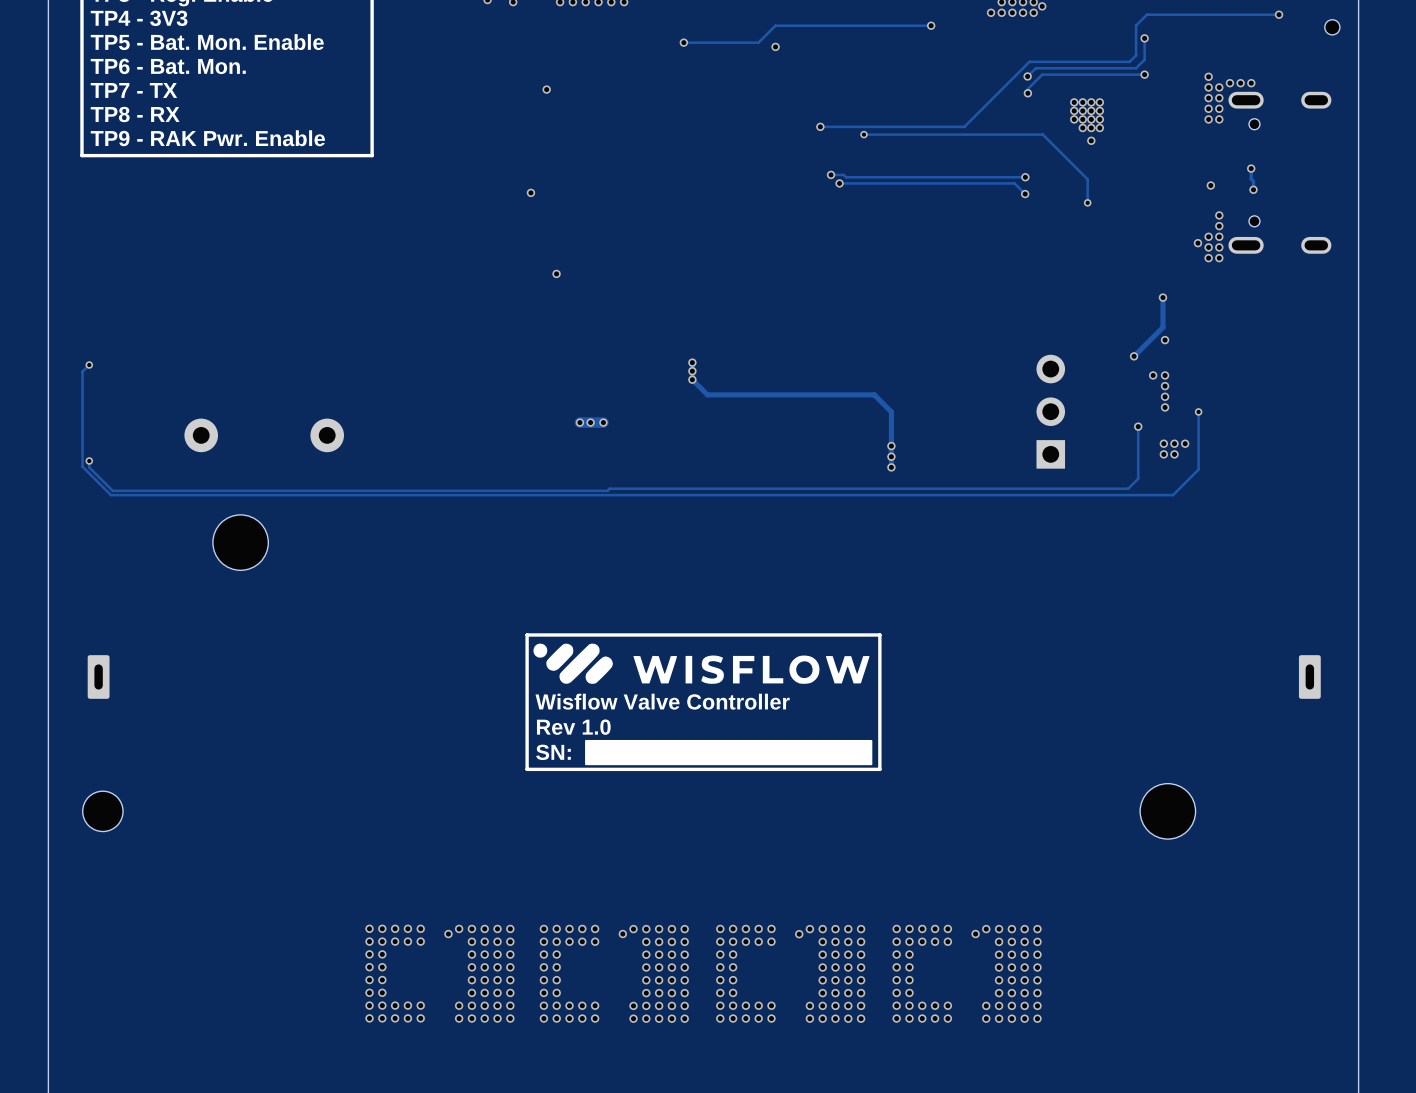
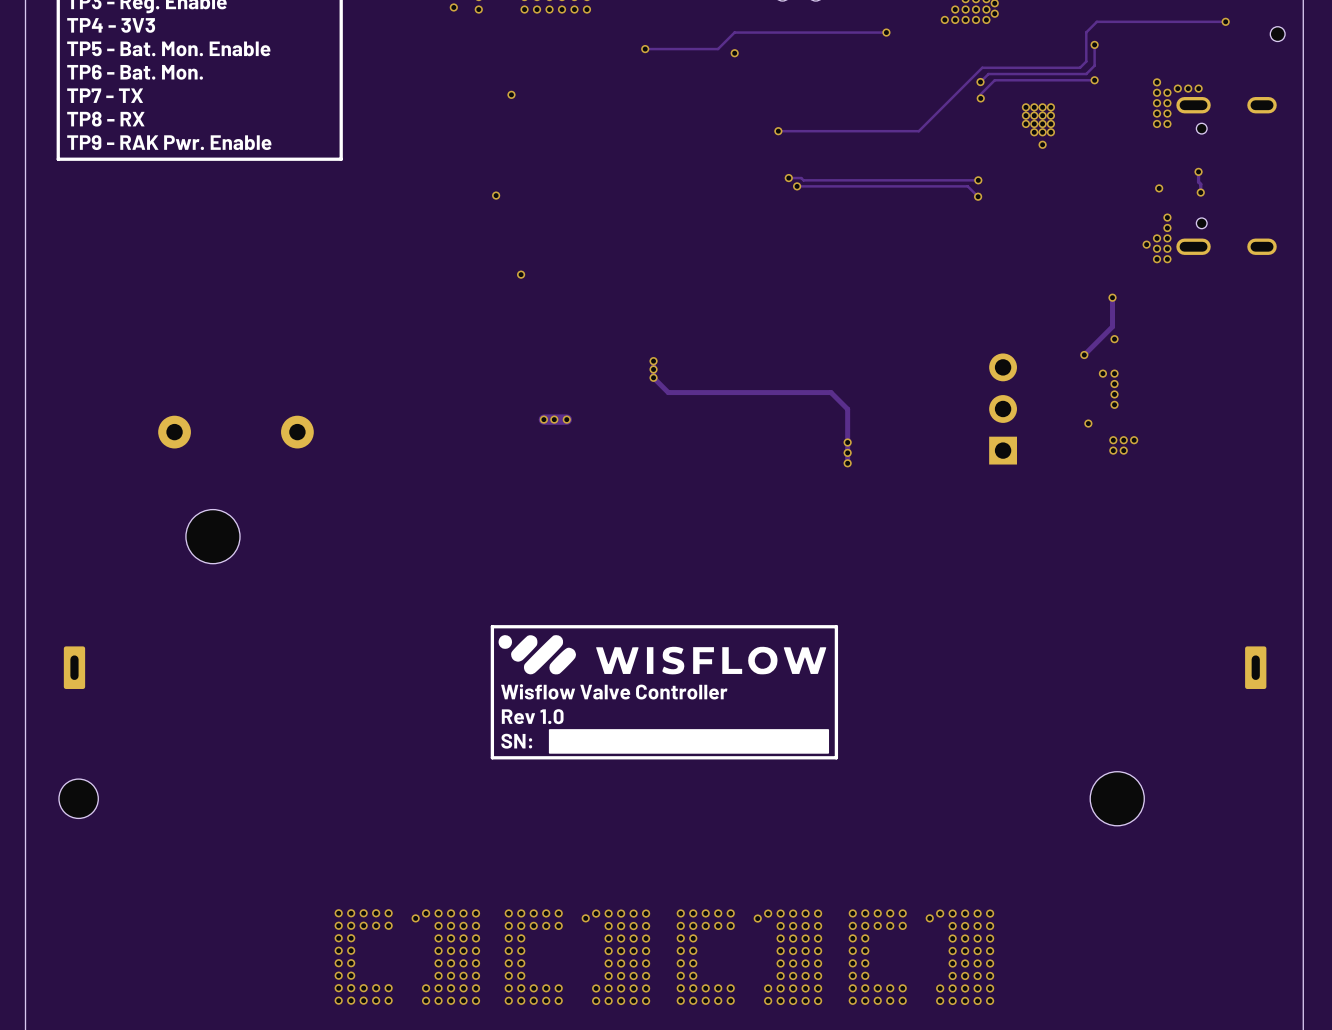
track: (863, 134) (1042, 134) (1087, 179) (1087, 202) -> none
via: (863, 134) -> none
via: (1087, 202) -> none
track: (89, 365) (82, 371) (82, 466) (110, 495) (1173, 495) (1198, 469) (1198, 411) -> none
via: (89, 365) -> none
via: (1198, 411) -> none
track: (1138, 426) (1138, 478) (1128, 488) (112, 490) (89, 467) (89, 461) -> none
via: (89, 461) -> none

